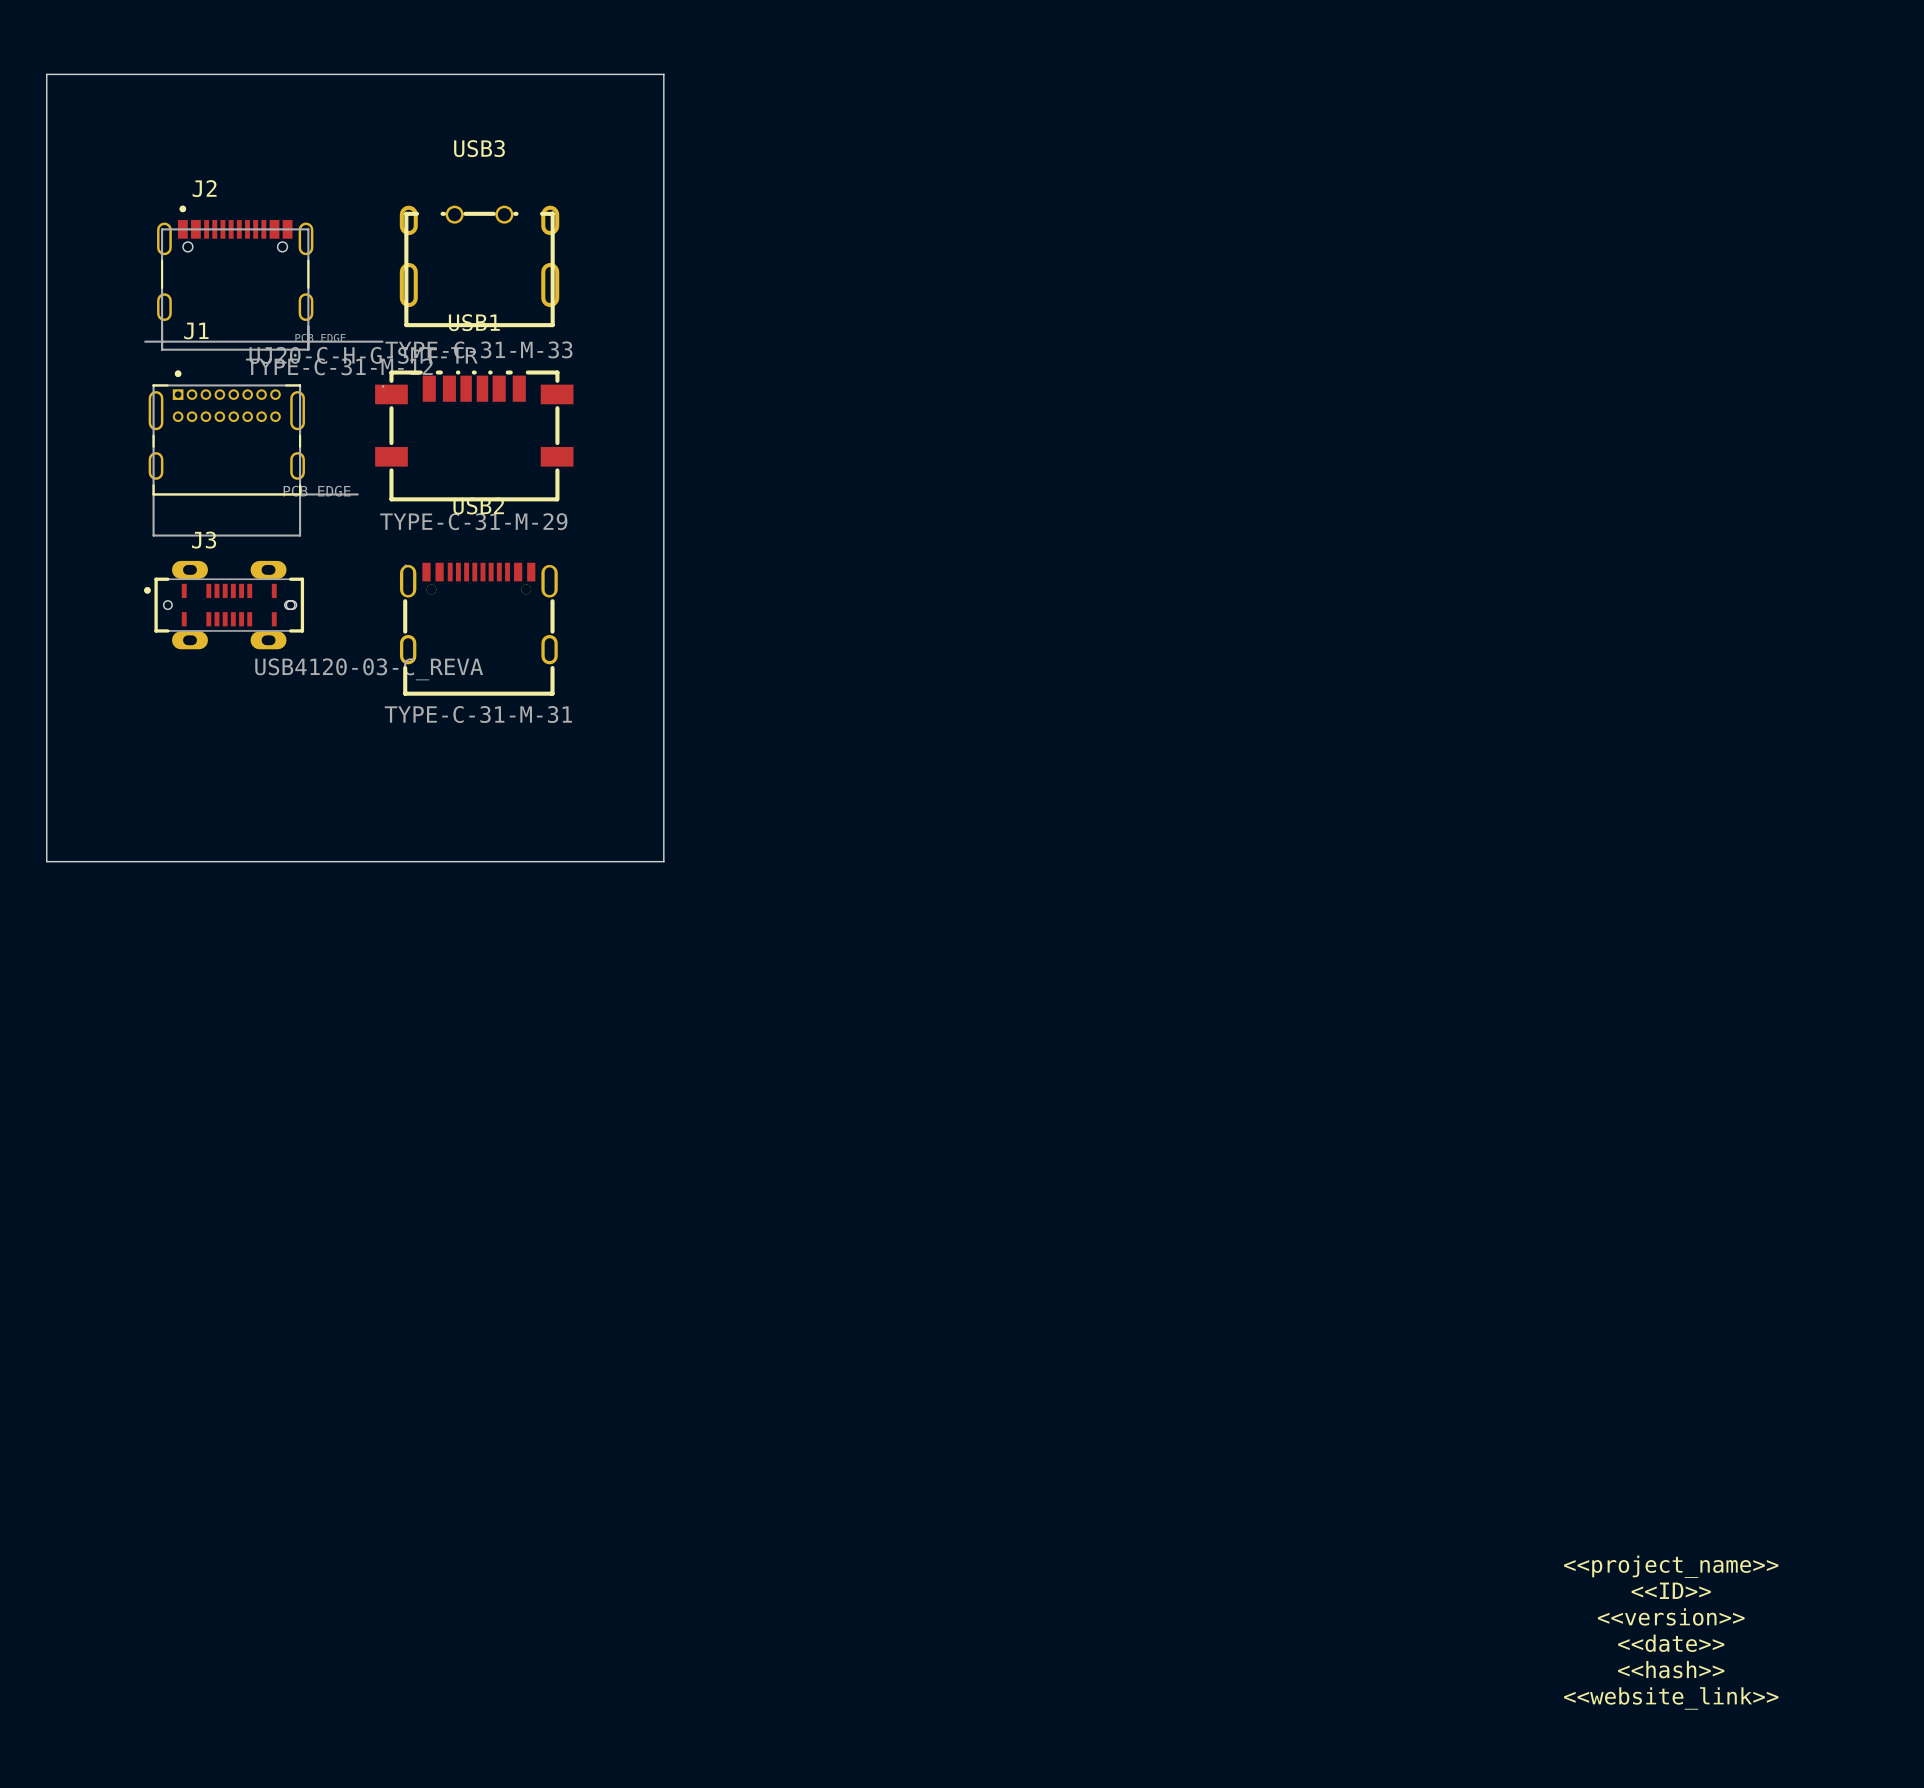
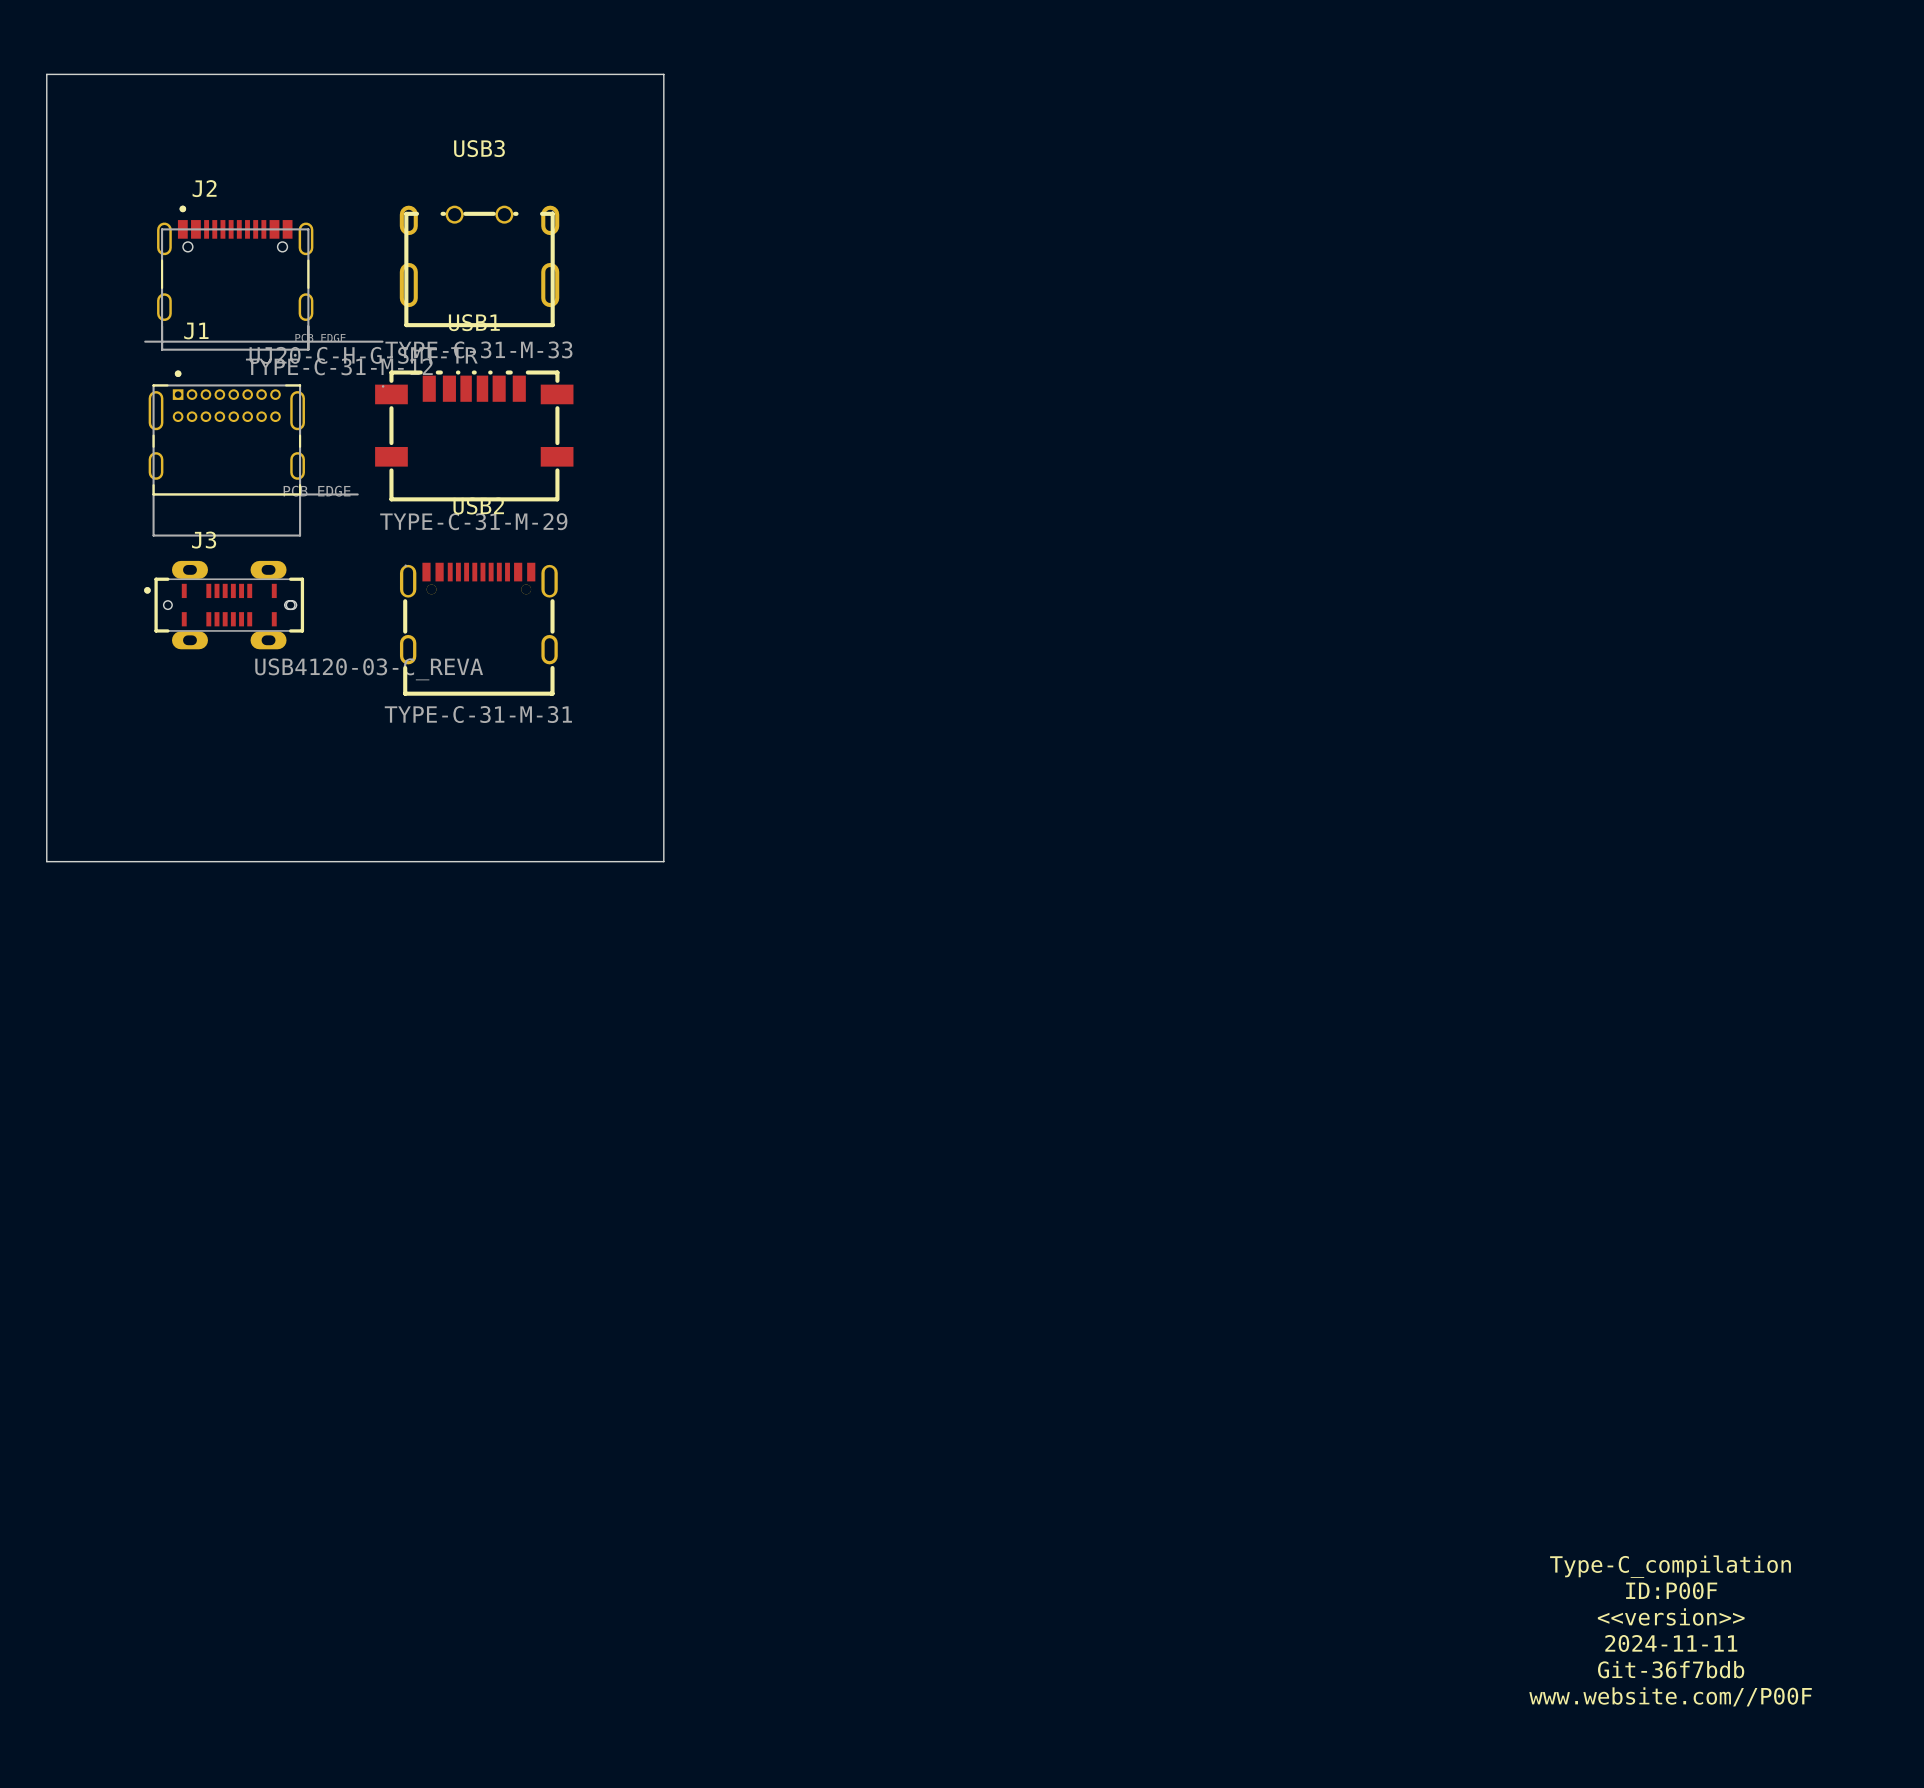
text: <<project_name>> (1671, 1566) -> Type-C_compilation (1670, 1566)
text: <<ID>> (1671, 1590) -> ID:P00F (1671, 1590)
text: <<date>> (1671, 1643) -> 2024-11-11 (1671, 1643)
text: <<hash>> (1671, 1669) -> Git-36f7bdb (1671, 1669)
text: <<website_link>> (1671, 1698) -> www.website.com//P00F (1670, 1696)

